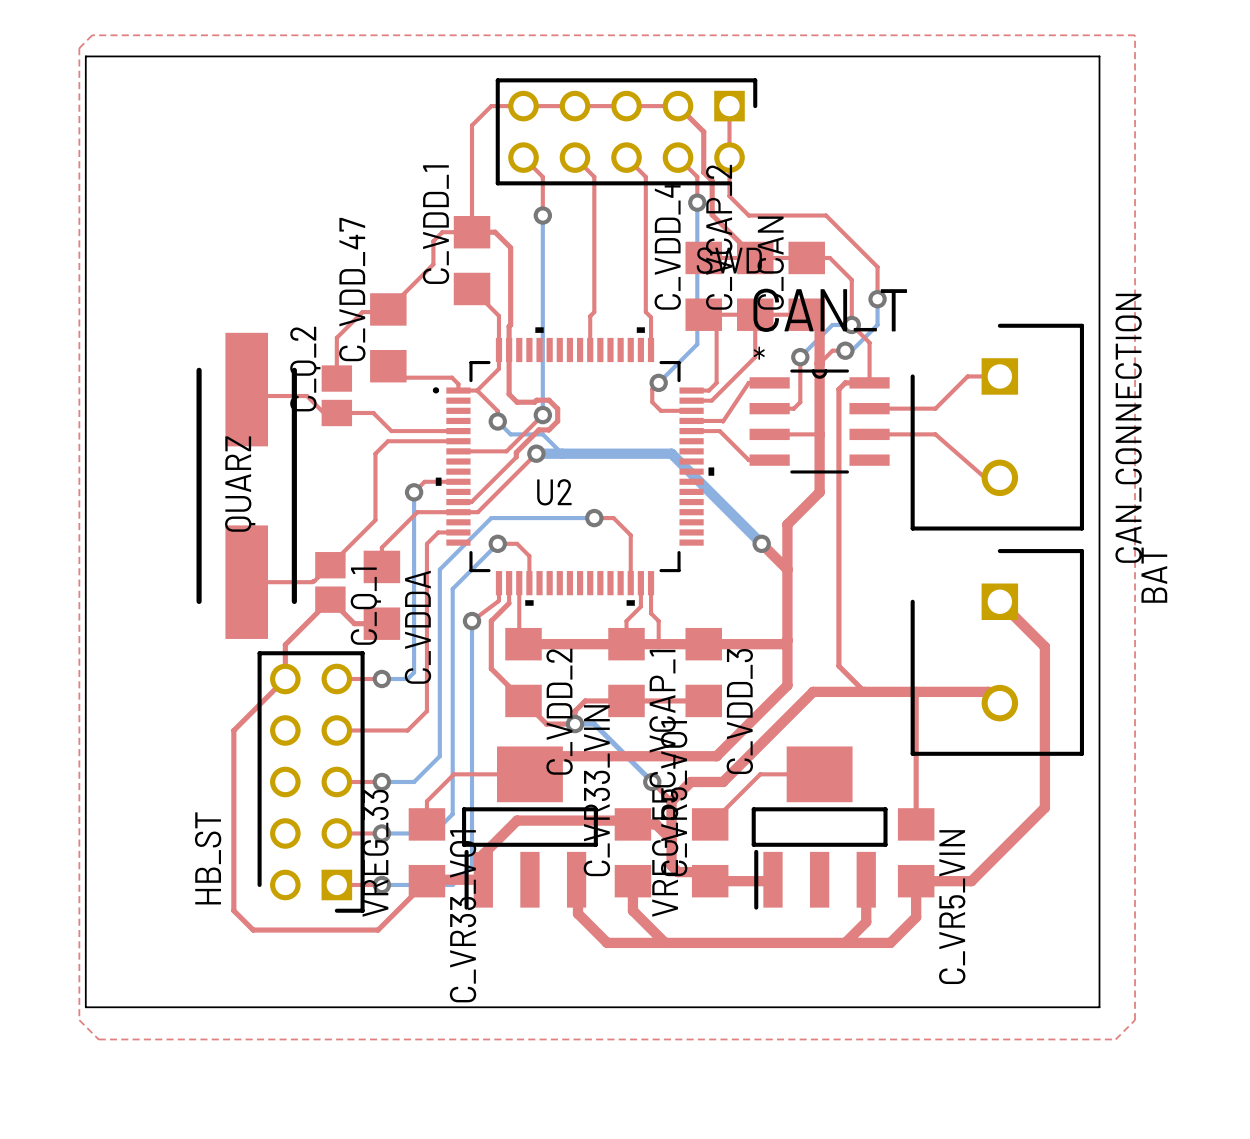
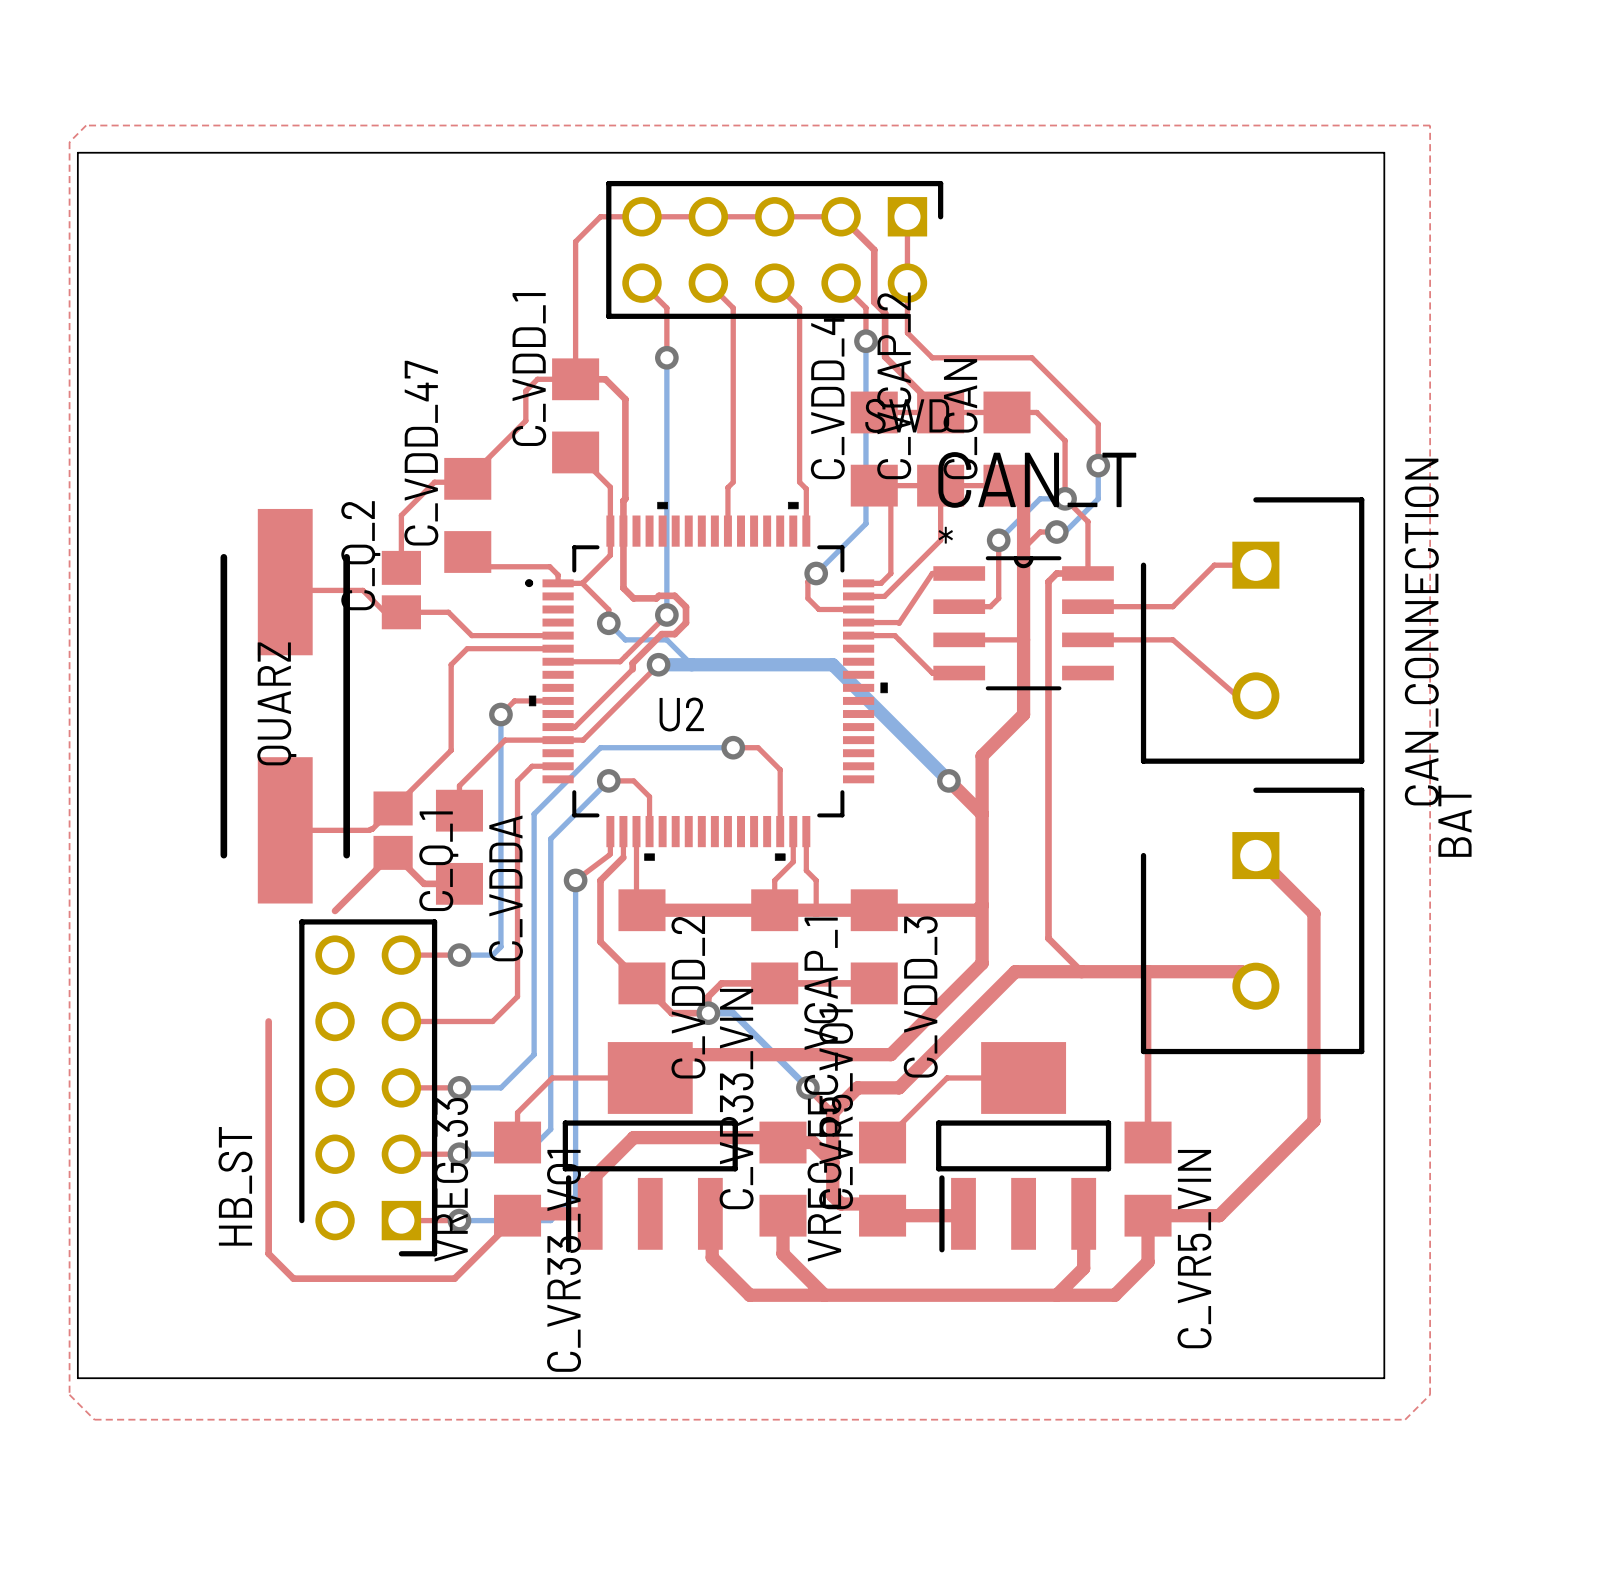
top track: (285, 644) (285, 678) (233, 730) -> none

